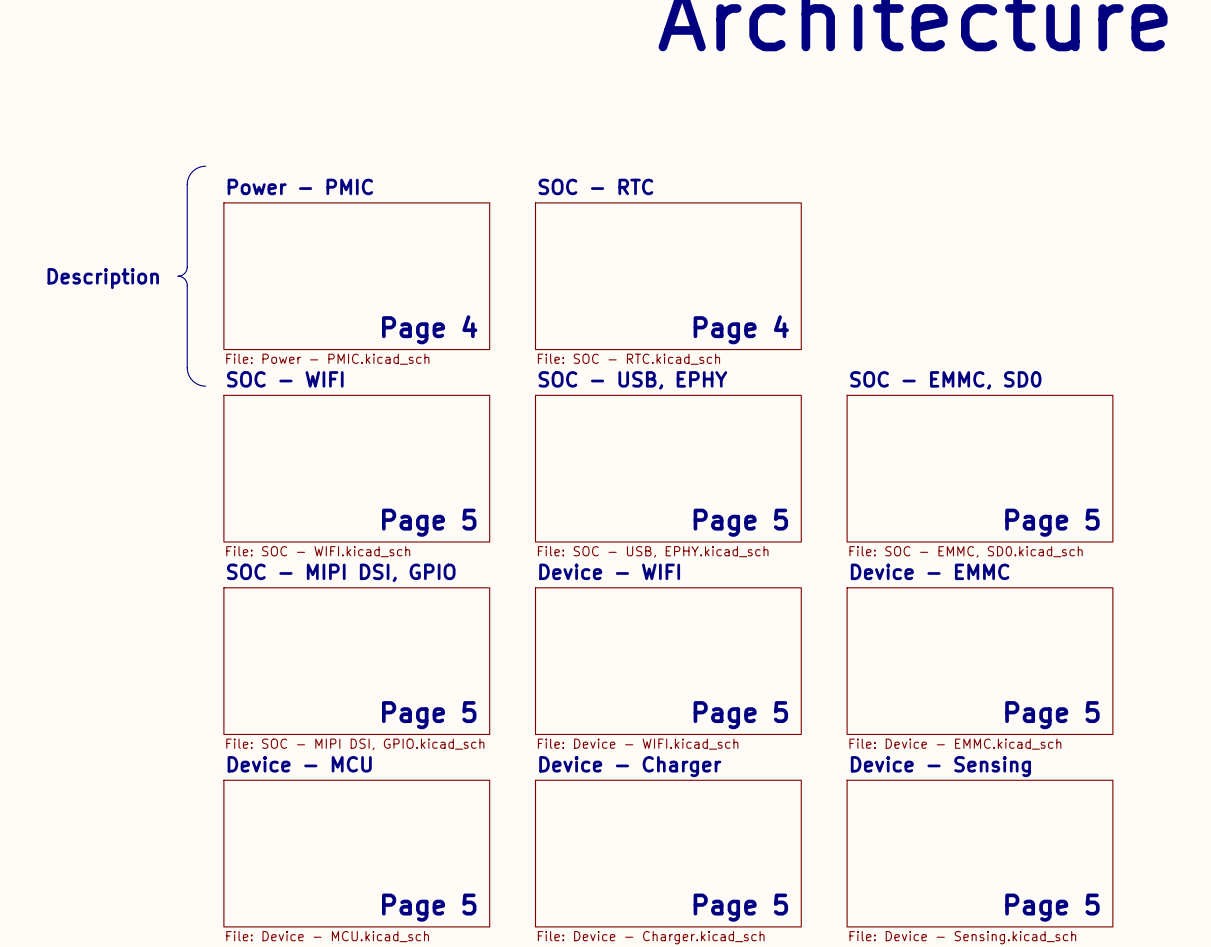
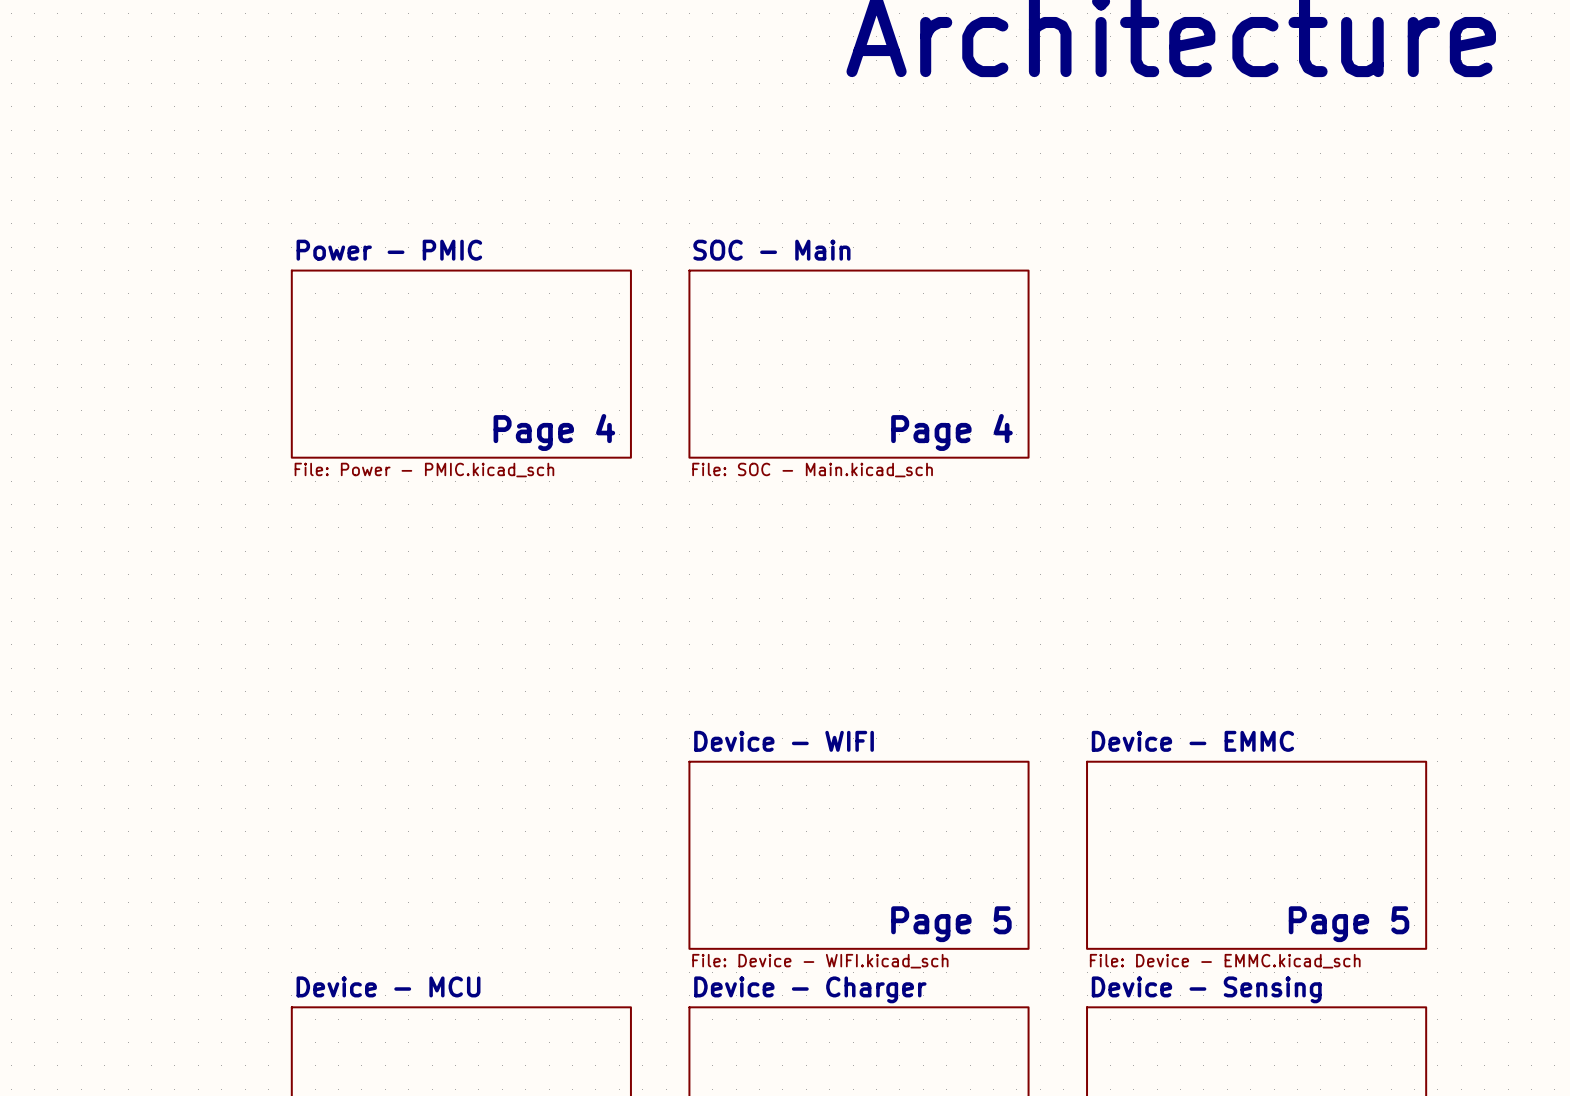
line: (205, 166) (194, 170) (187, 180) (187, 268) (184, 273) (178, 276) (183, 278) (187, 284) (187, 372) (194, 382) (205, 386) -> none
sheet SOC - RTC name: SOC - RTC (595, 186) -> SOC - Main (771, 250)
text: Description (103, 278) -> none
sheet SOC - RTC value: File: SOC - RTC.kicad_sch (628, 359) -> File: SOC - Main.kicad_sch (812, 470)
sheet SOC - WIFI: File: SOC - WIFI.kicad_sch (356, 468) -> none
sheet SOC - USB, EPHY: File: SOC - USB, EPHY.kicad_sch (668, 468) -> none
sheet SOC - EMMC, SD0: File: SOC - EMMC, SD0.kicad_sch (979, 468) -> none
text: Page 5 (429, 522) -> none
text: Page 5 (740, 522) -> none
text: Page 5 (1052, 522) -> none
sheet SOC - MIPI DSI, GPIO: File: SOC - MIPI DSI, GPIO.kicad_sch (356, 661) -> none
text: Page 5 (429, 715) -> none

